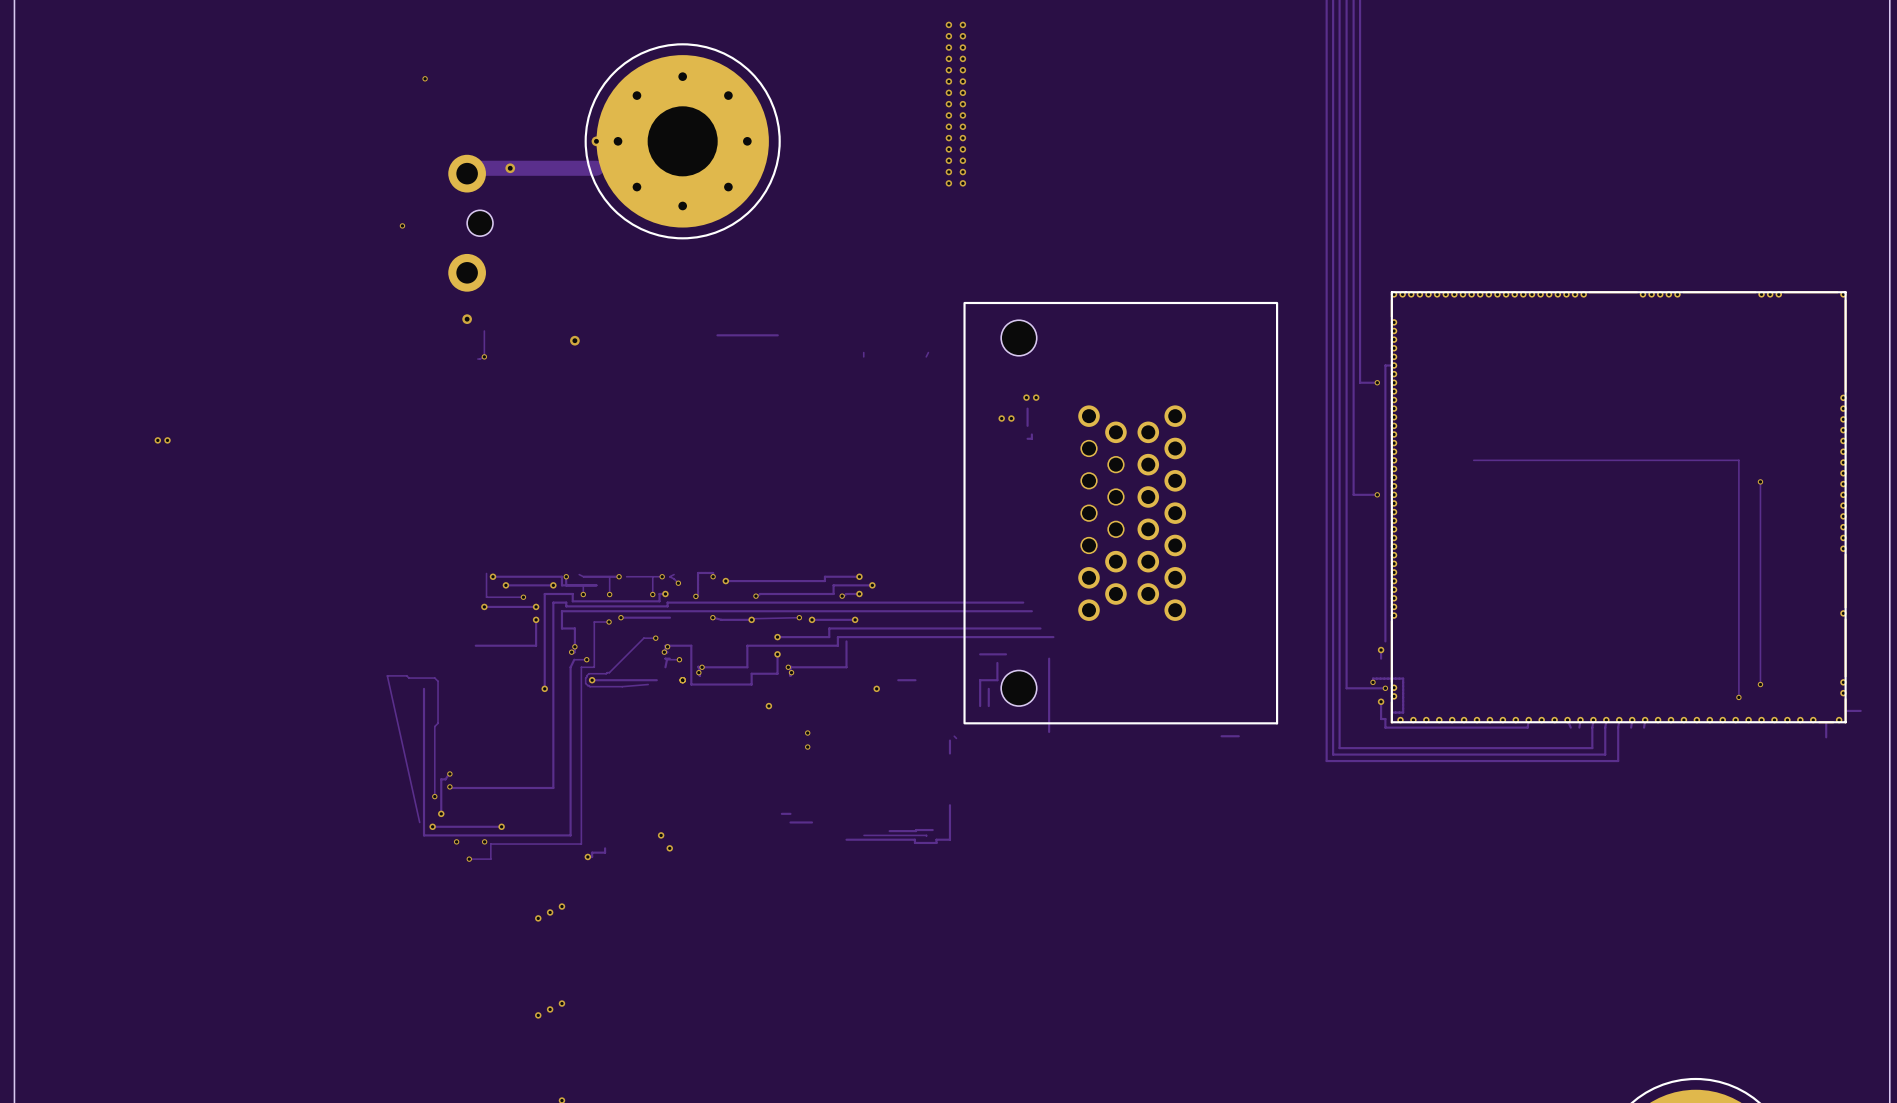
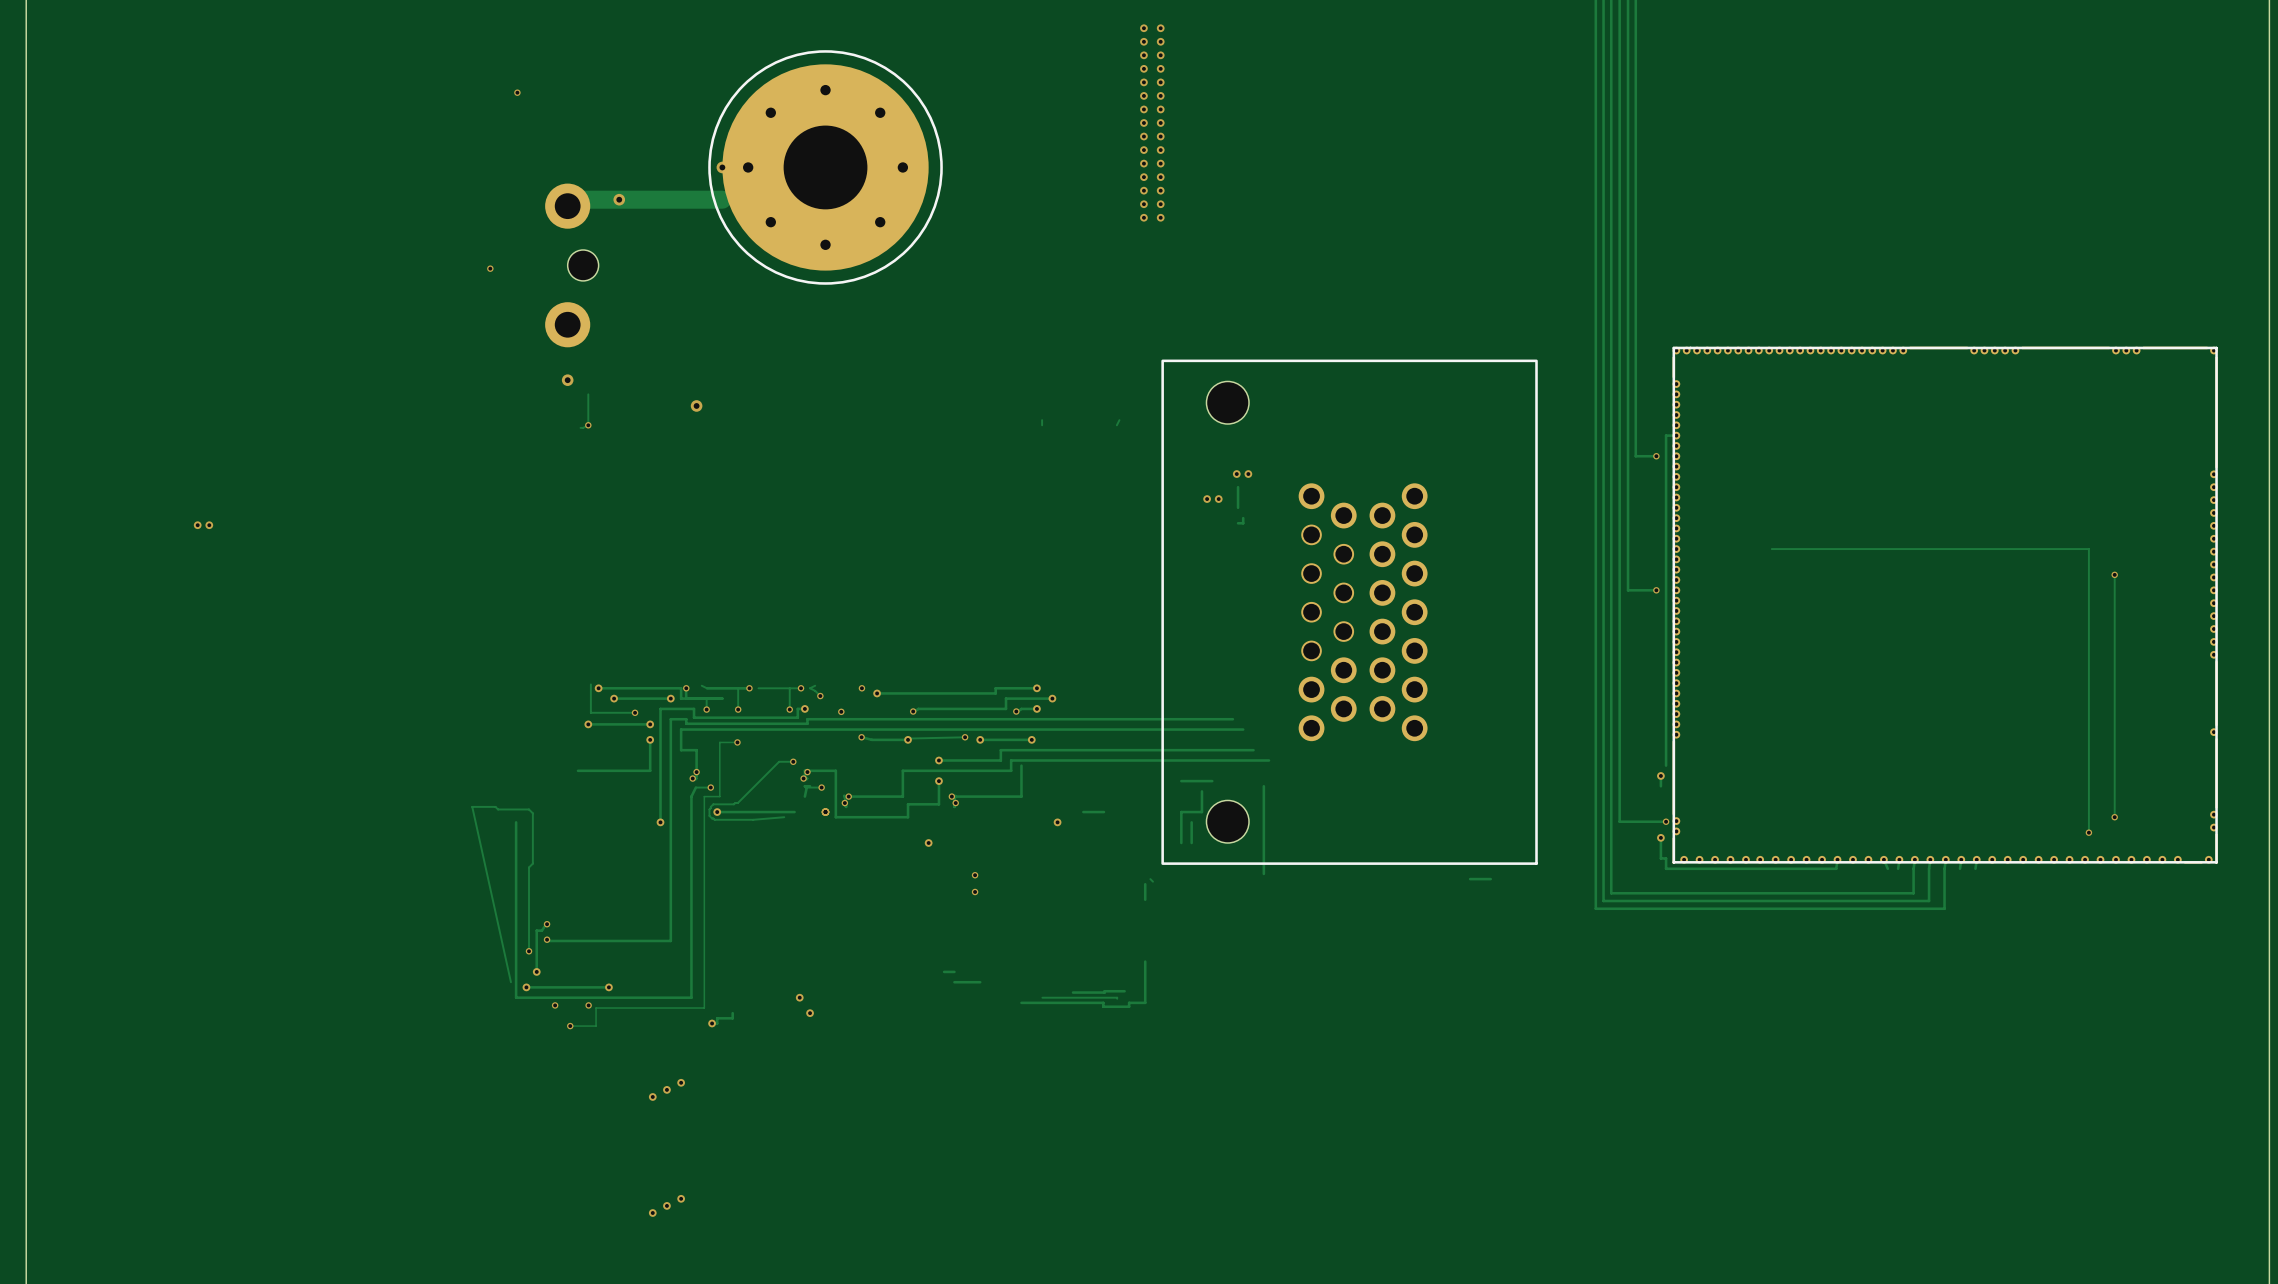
track: (777, 335) (717, 335) -> none
track: (713, 576) (713, 572) (698, 572) (698, 595) (695, 596) -> none
via: (620, 617) -> none
track: (670, 617) (620, 617) -> none
track: (1373, 682) (1373, 678) (1403, 678) (1403, 712) (1391, 712) -> none
via: (1373, 682) -> none
track: (1860, 710) (1845, 710) -> none
track: (1826, 722) (1826, 737) -> none

